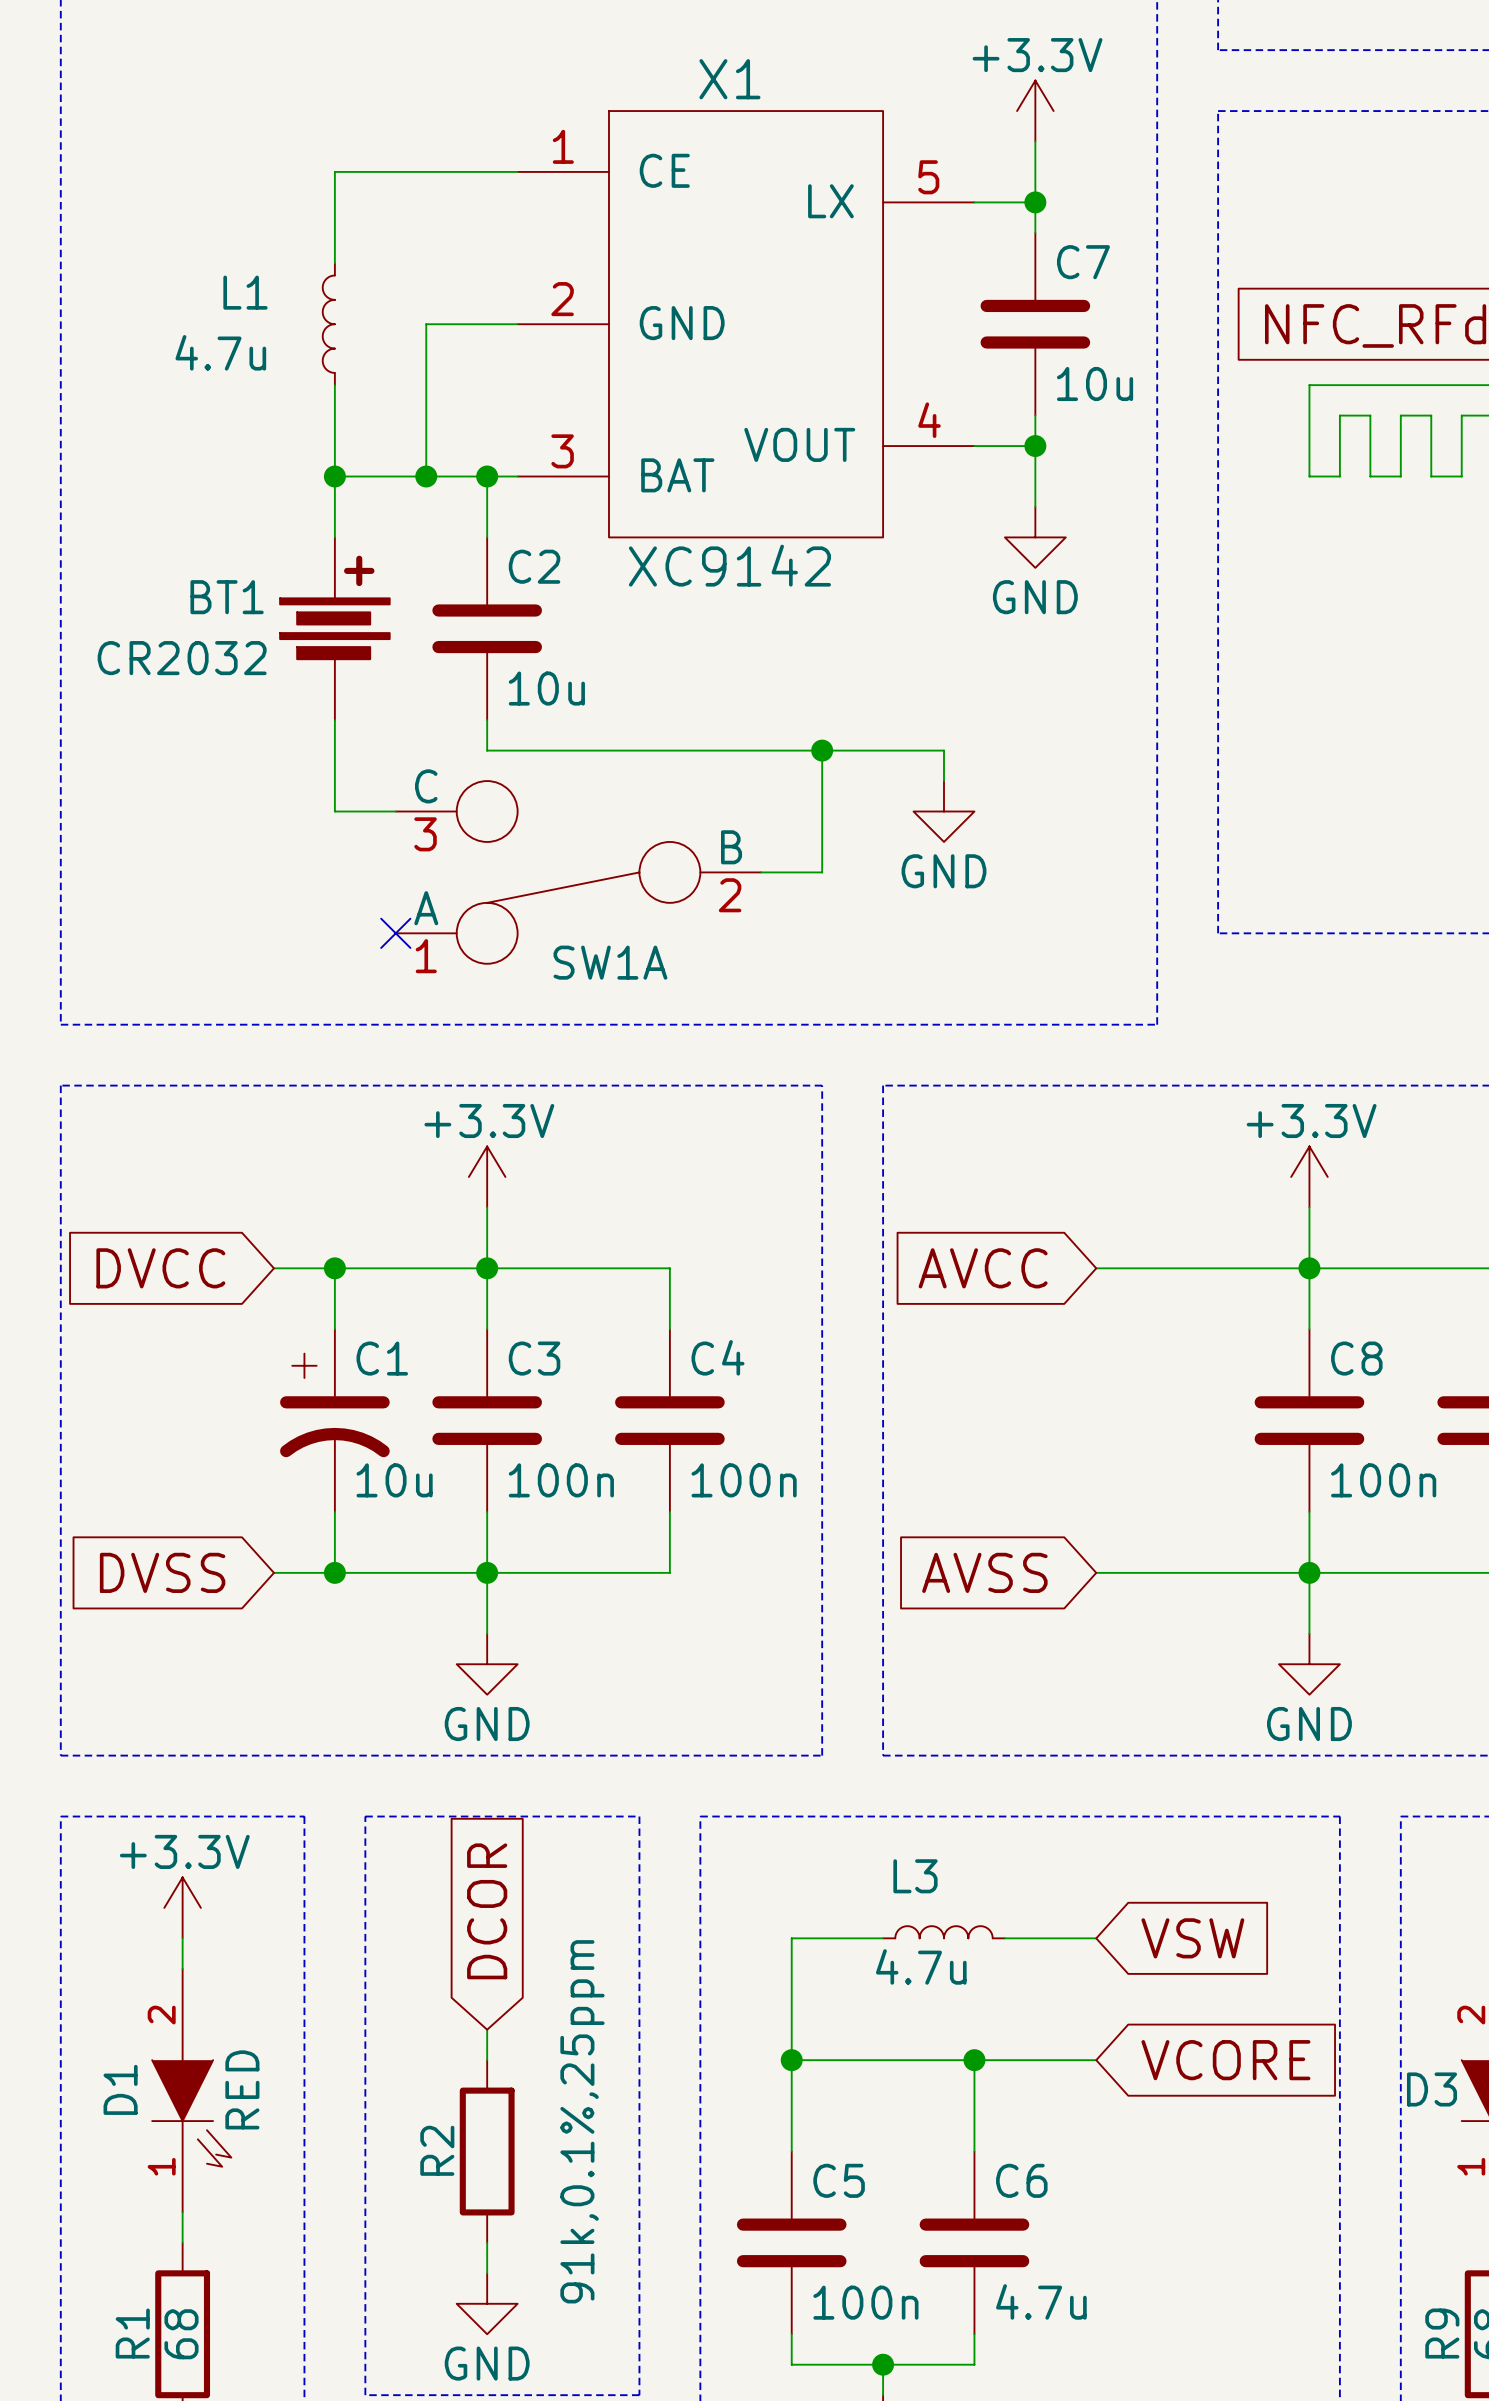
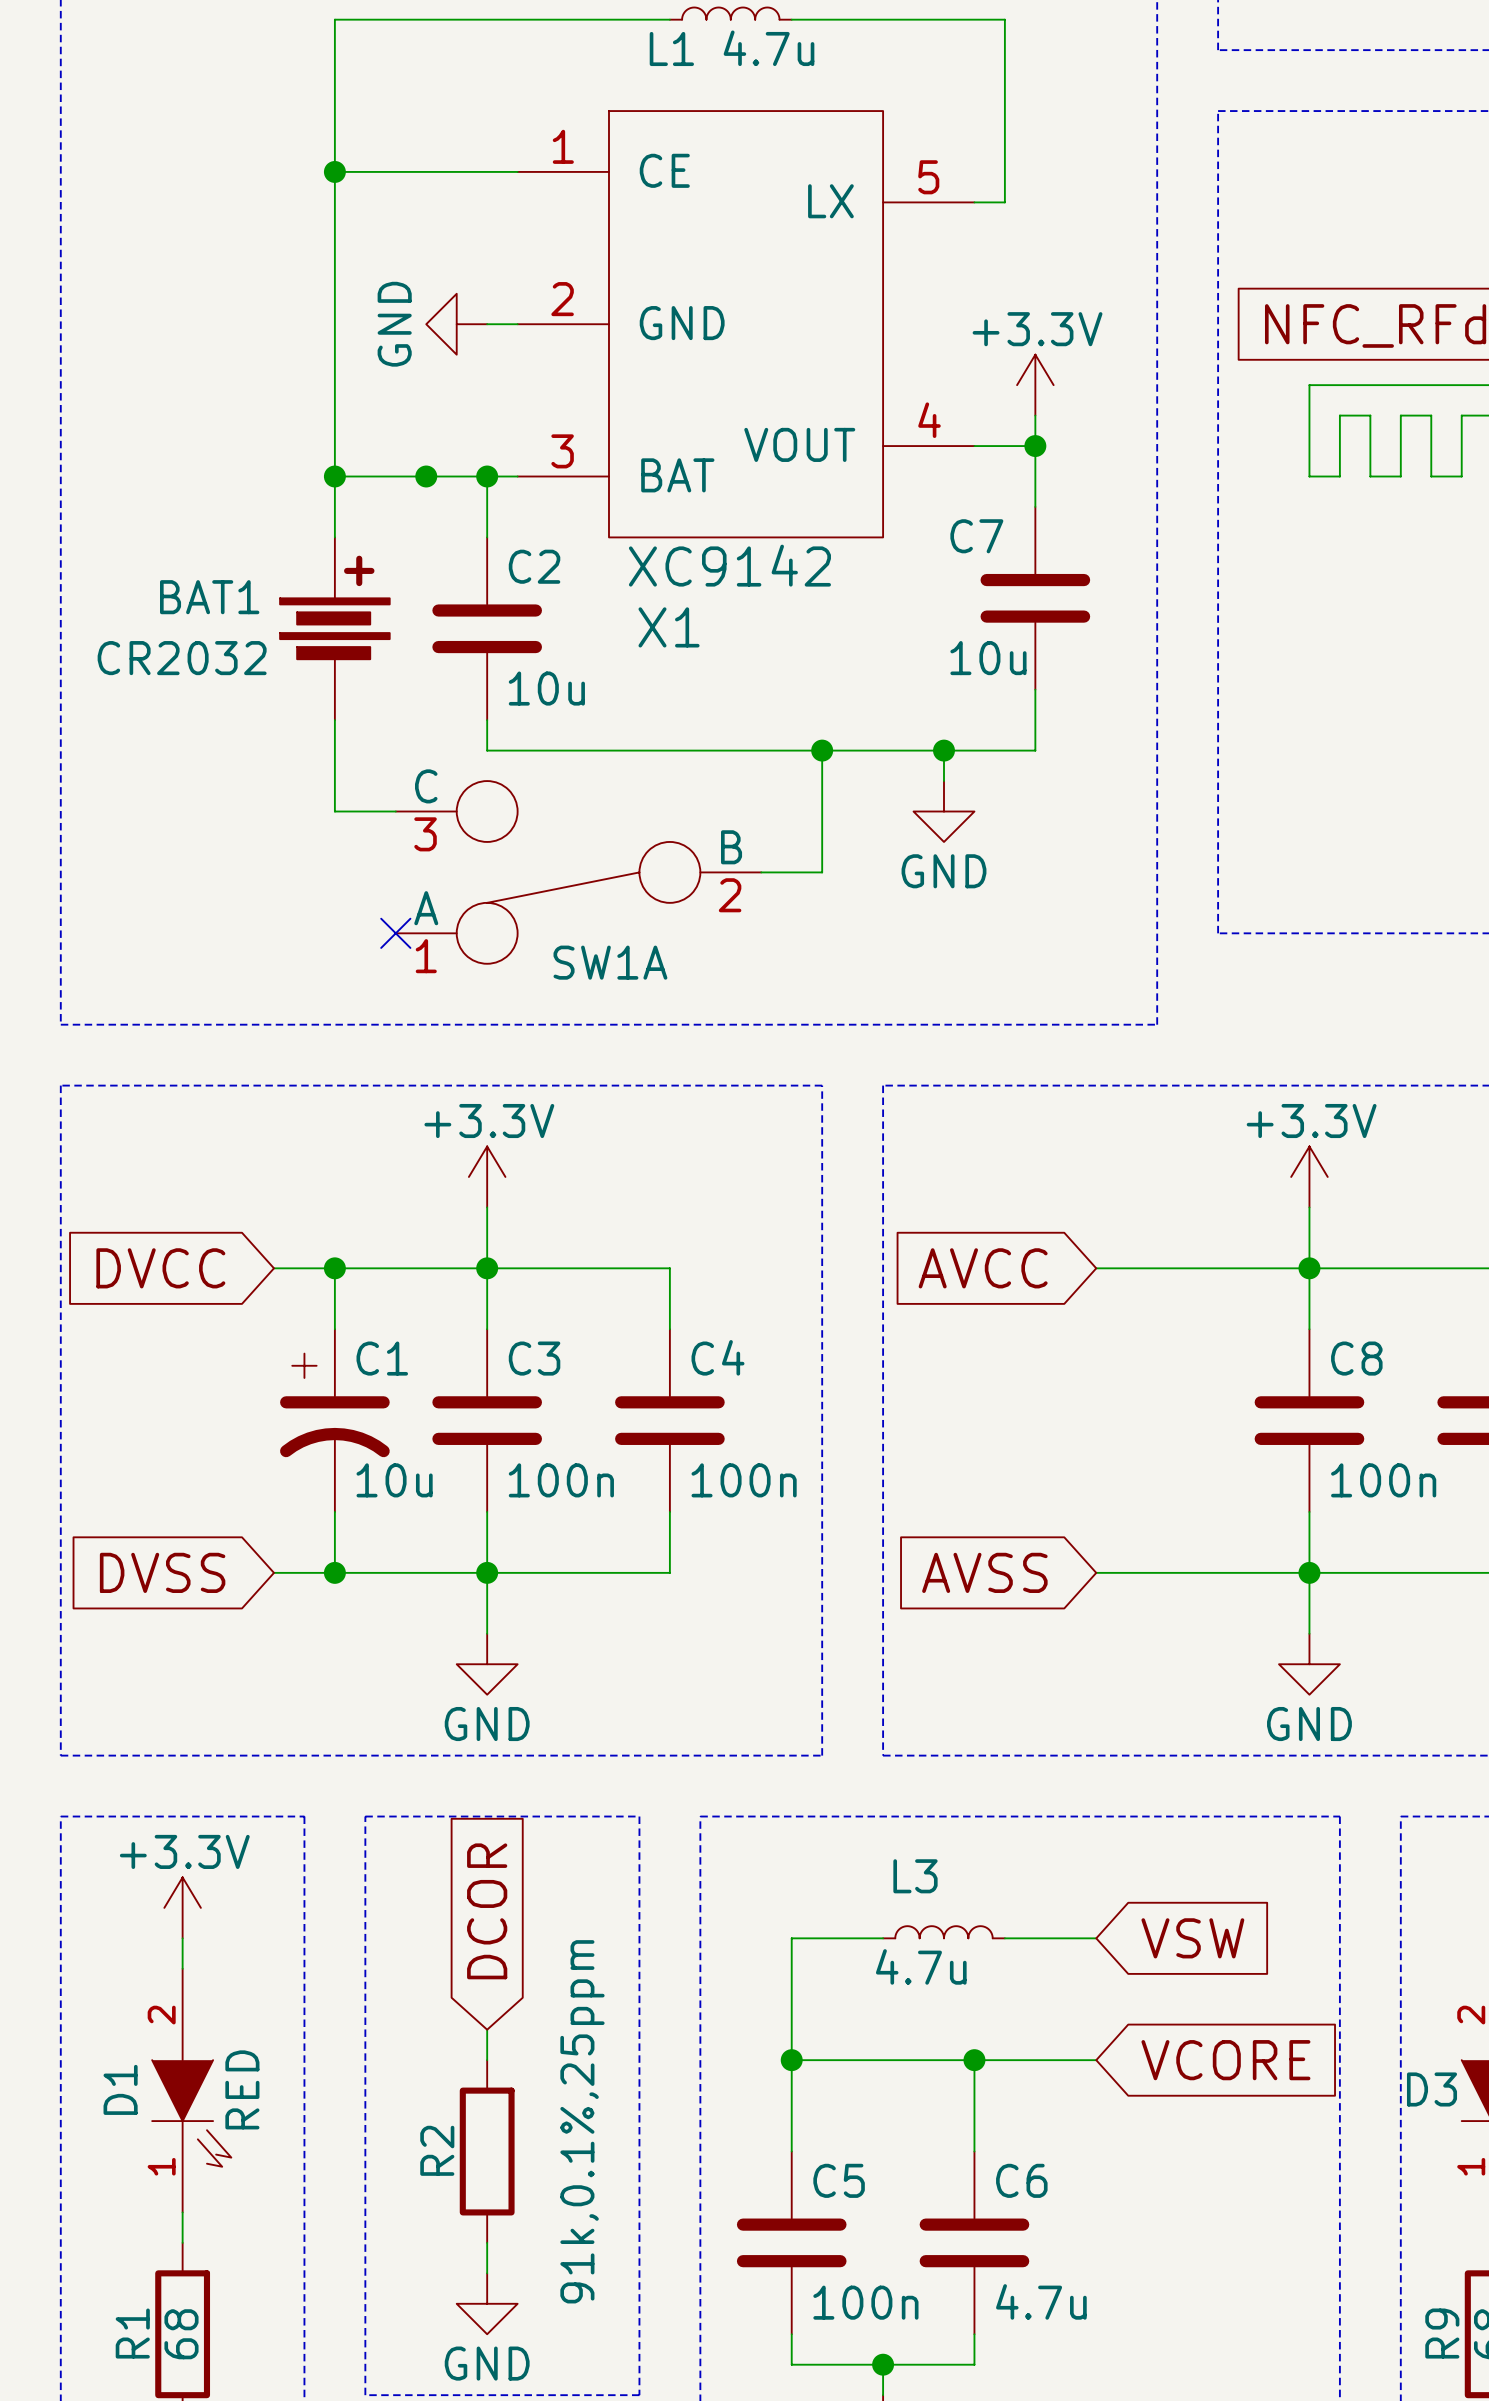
wire: none -> (669, 19) (334, 19) (334, 171)
X1 name position: X1 (729, 79) -> X1 (669, 627)
power symbol position: +3.3V (1035, 111) -> +3.3V (1035, 385)
wire: (1035, 141) (1035, 232) -> none
junction: none -> (334, 171)
wire: (1004, 202) (1035, 202) -> (1004, 202) (1004, 19) (791, 19)
junction: (1035, 202) -> none
C7 name position: C7 (1083, 262) -> C7 (976, 536)
wire: none -> (334, 263) (334, 385)
L1 name position: L1 (245, 292) -> L1 (671, 48)
L1 rotation: 0° (328, 324) -> 90° clockwise (730, 13)
L1 position: (328, 324) -> (730, 13)
power symbol: none -> GND (456, 324)
wire: (487, 324) (426, 324) (426, 476) -> none
C7 position: (1035, 324) -> (1035, 598)
L1 value position: 4.7u (220, 352) -> 4.7u (769, 48)
C7 value position: 10u (1095, 384) -> 10u (988, 658)
power symbol: GND (1035, 537) -> none
BT1 name: BT1 (227, 597) -> BAT1 (209, 597)
wire: none -> (1035, 689) (1035, 750) (944, 750)
junction: none -> (944, 750)

